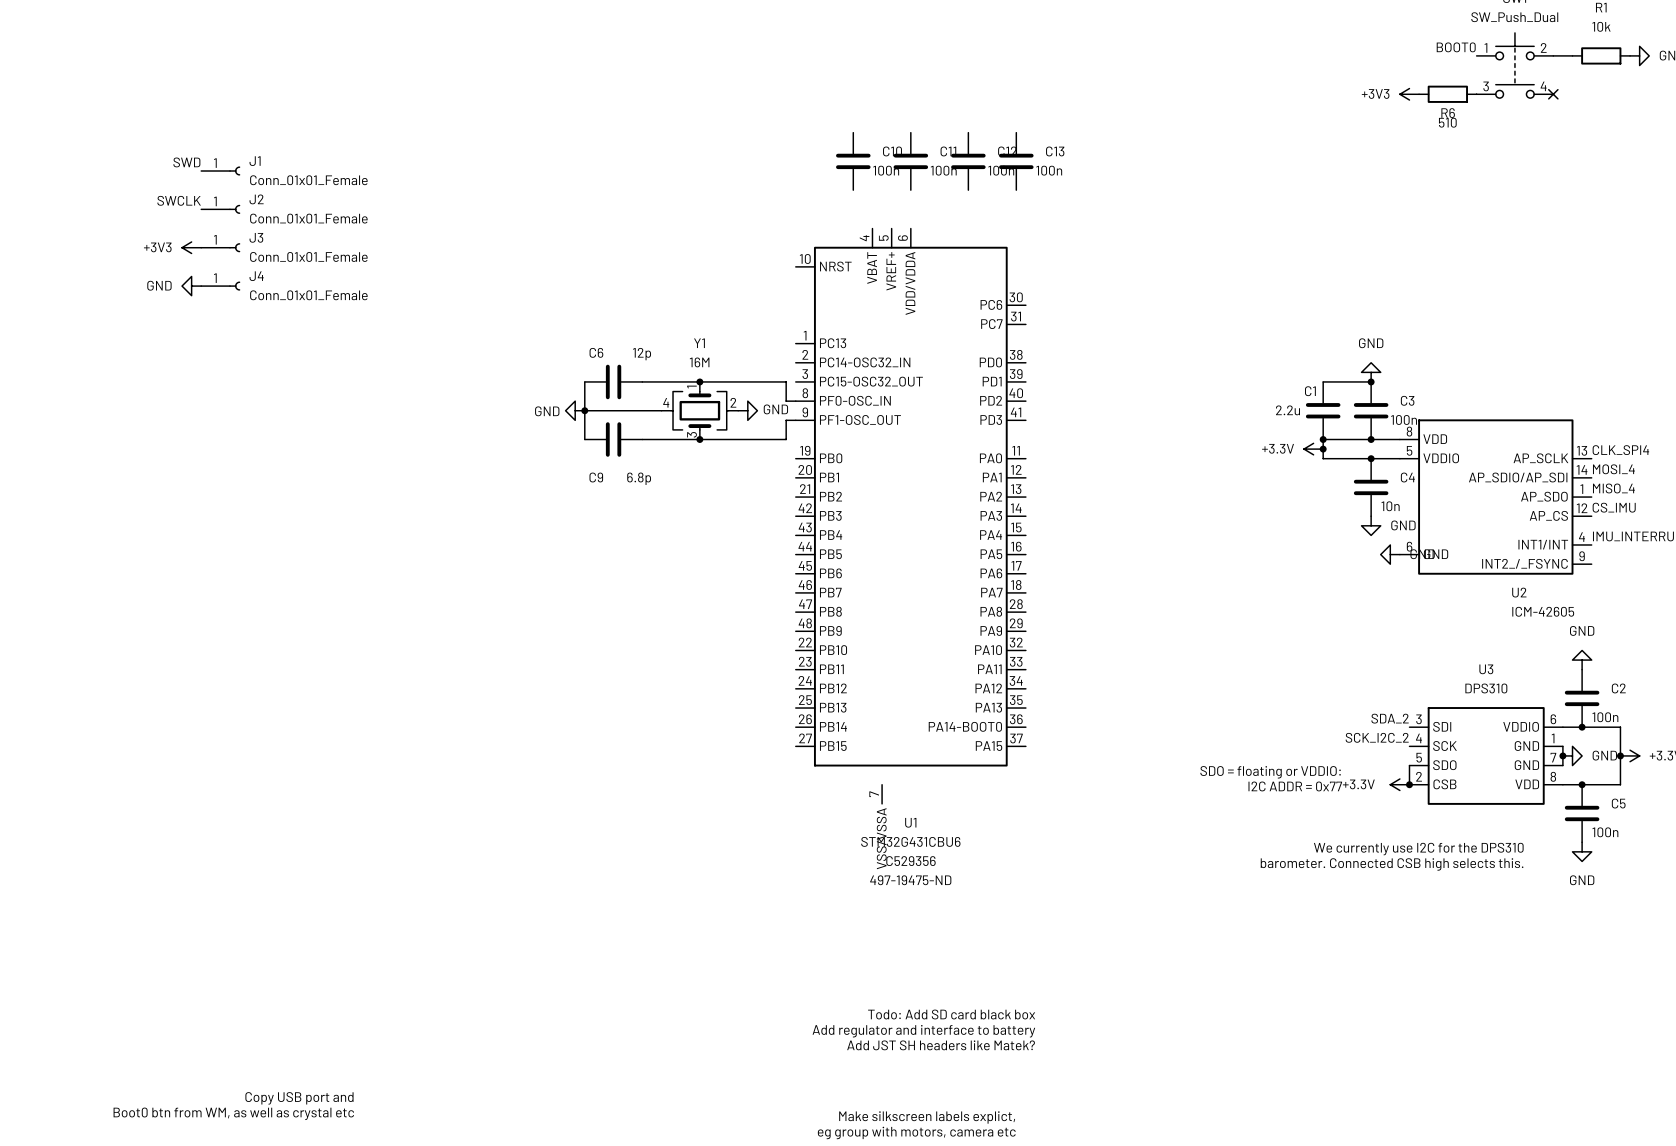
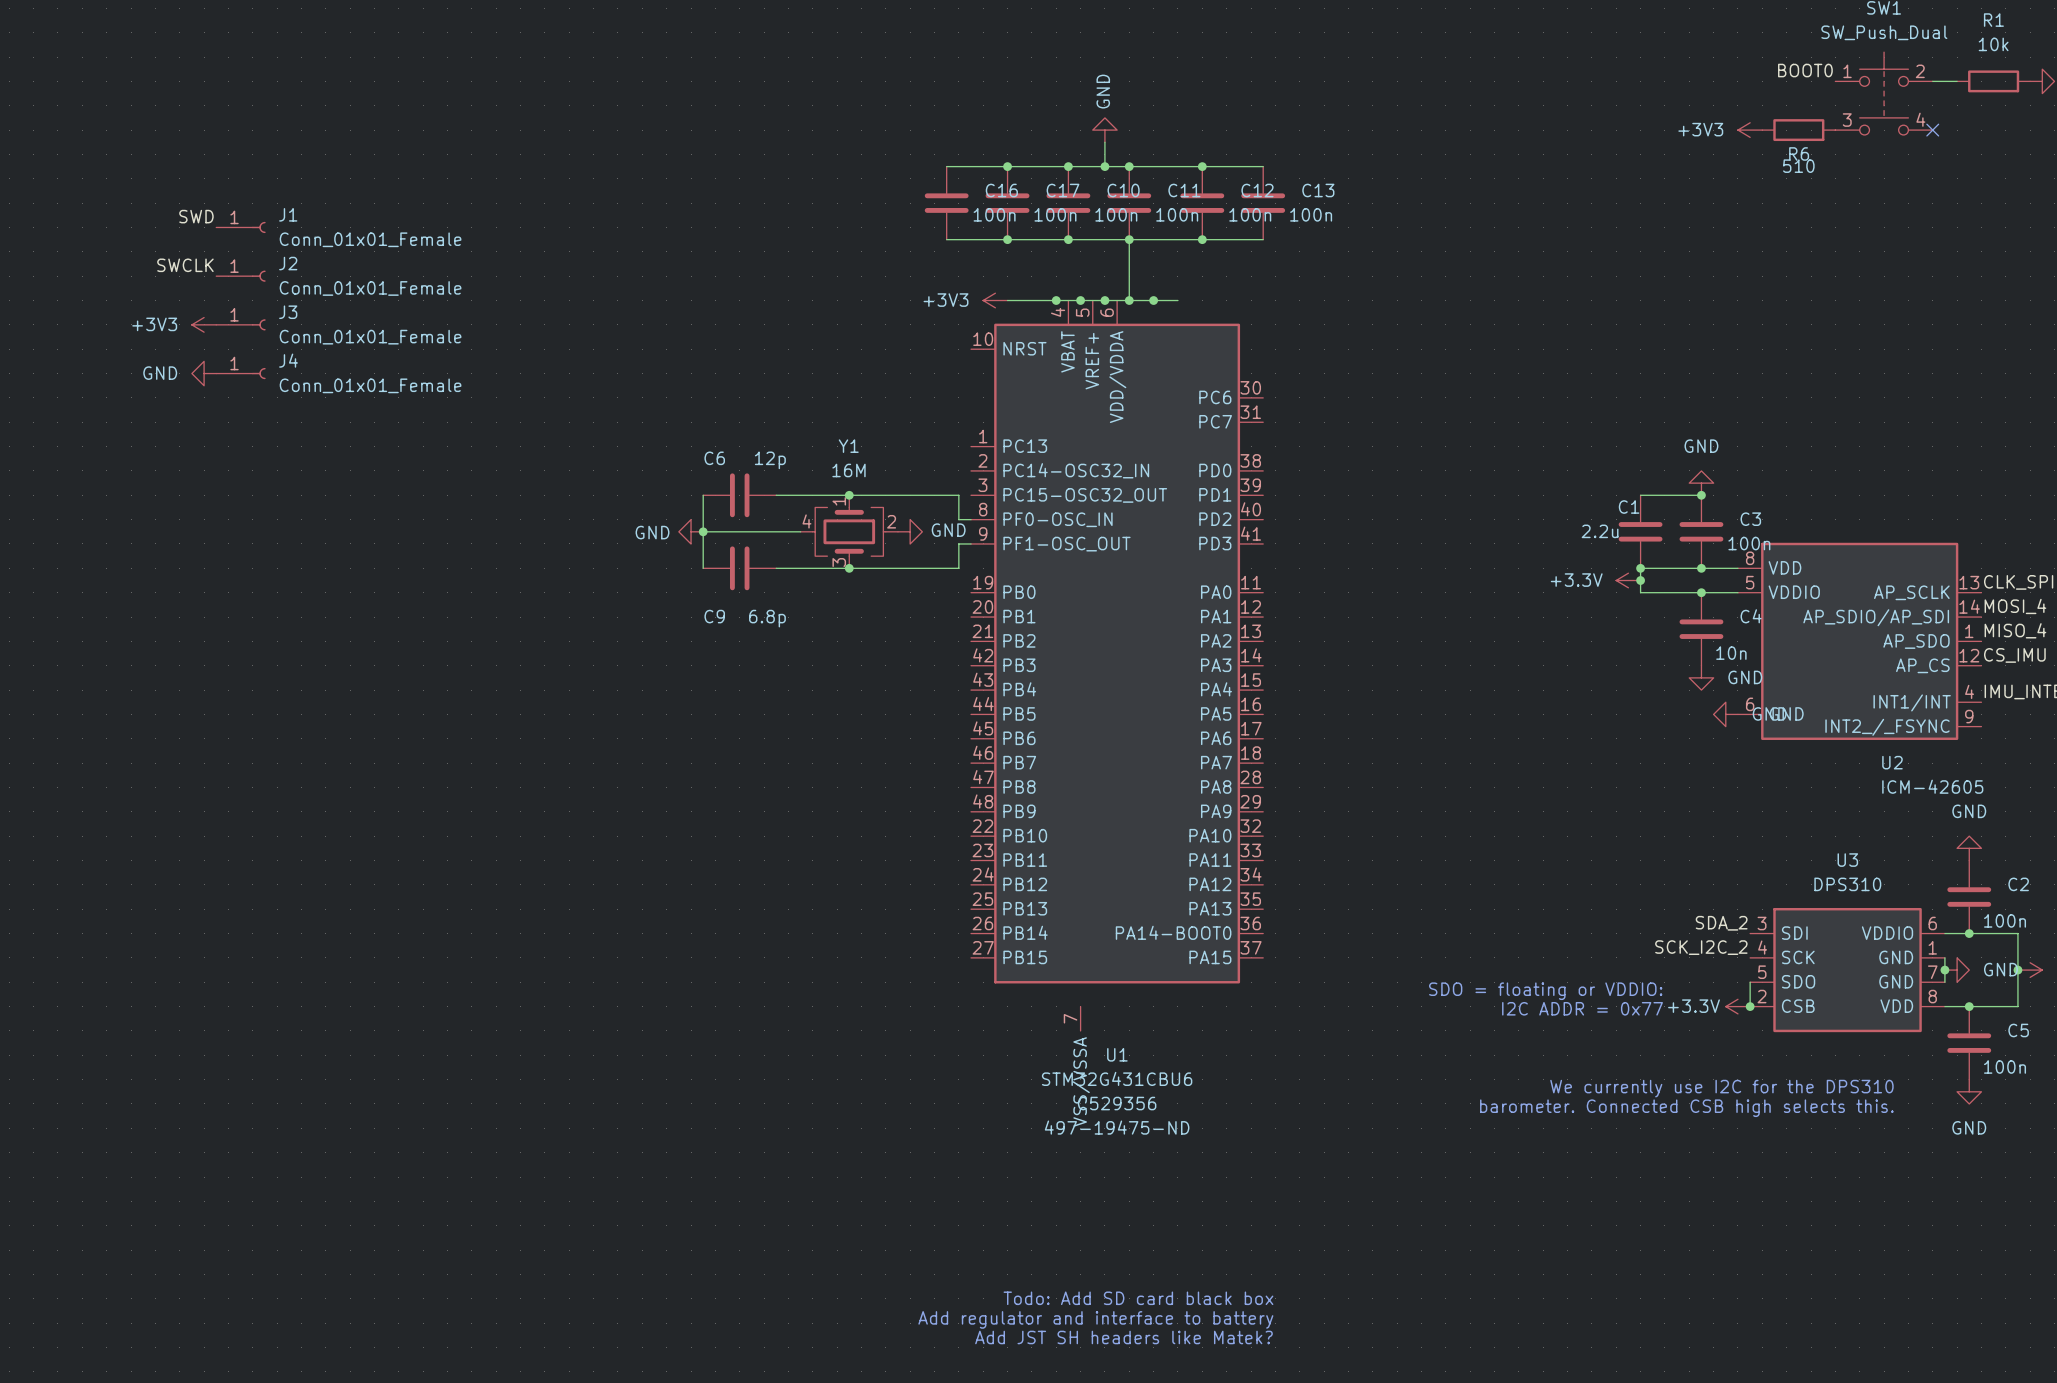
power symbol: none -> GND (1104, 130)
wire: none -> (1104, 142) (1104, 166)
wire: none -> (946, 166) (1263, 166)
junction: none -> (1007, 166)
junction: none -> (1068, 166)
junction: none -> (1104, 166)
junction: none -> (1129, 166)
junction: none -> (1202, 166)
C16: none -> 100n (946, 203)
C17: none -> 100n (1007, 203)
C10 position: (853, 161) -> (1068, 203)
C11 position: (910, 161) -> (1129, 203)
C12 position: (968, 161) -> (1202, 203)
C13 position: (1016, 161) -> (1263, 203)
wire: none -> (946, 239) (1263, 239)
junction: none -> (1007, 239)
junction: none -> (1068, 239)
wire: none -> (1129, 239) (1129, 300)
junction: none -> (1129, 239)
junction: none -> (1202, 239)
power symbol: none -> +3V3 (995, 300)
wire: none -> (1007, 300) (1177, 300)
junction: none -> (1056, 300)
junction: none -> (1080, 300)
junction: none -> (1104, 300)
junction: none -> (1129, 300)
junction: none -> (1153, 300)

